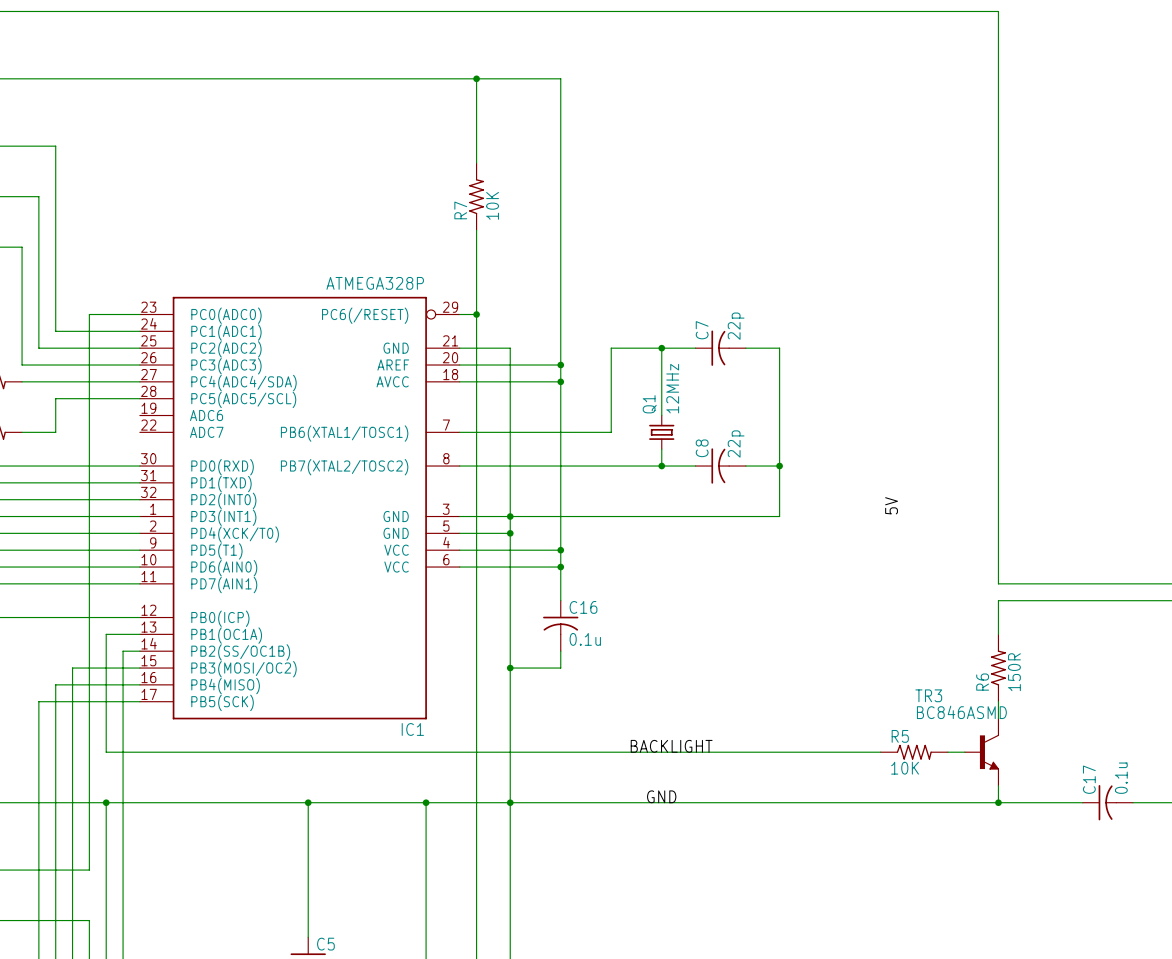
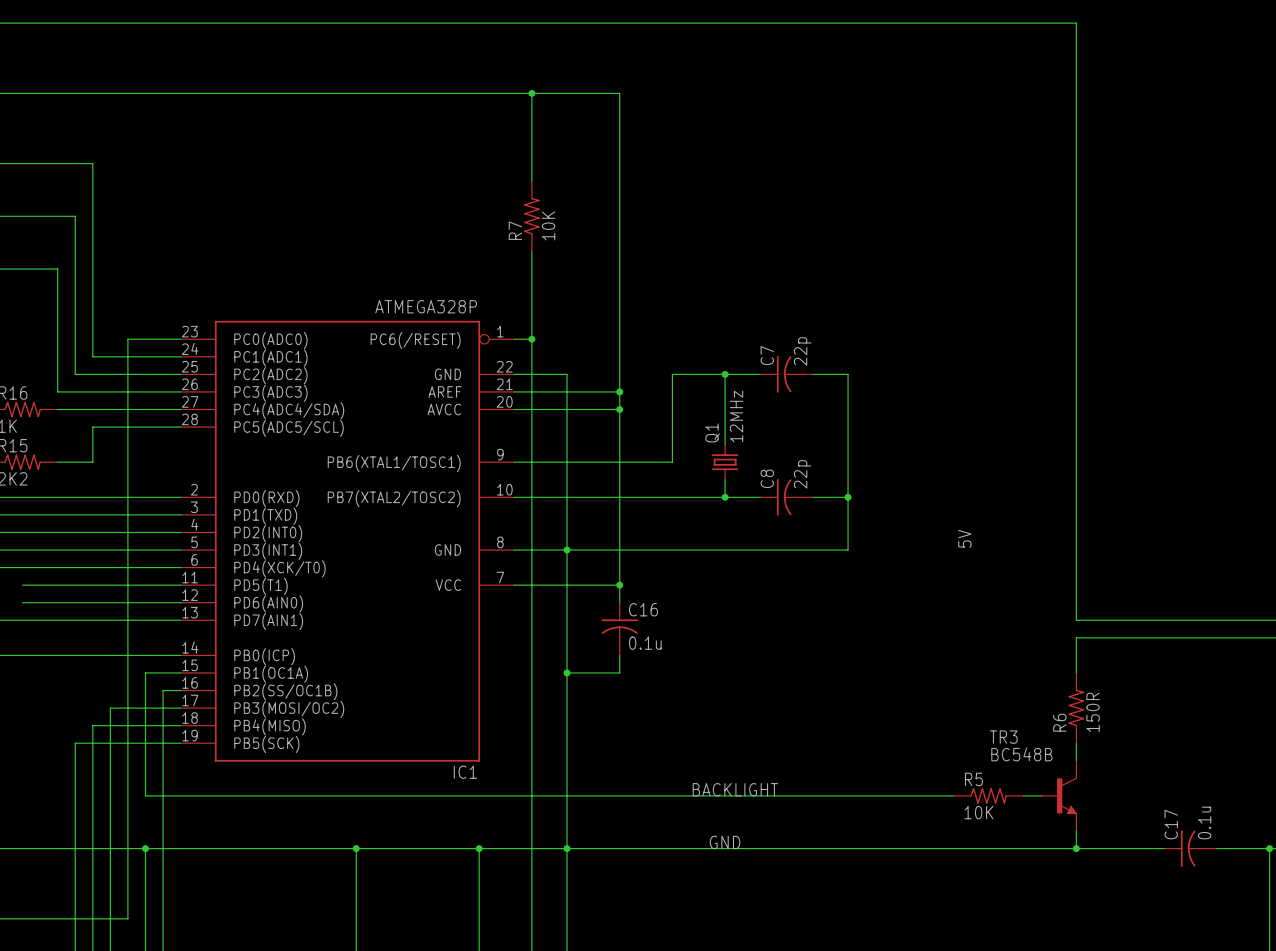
IC1 symbol: [139, 296, 460, 720] -> [180, 320, 515, 762]
wire: (459, 533) (510, 533) -> none
junction: (510, 533) -> none
wire: (459, 567) (560, 567) (560, 600) -> none
junction: (560, 567) -> none
C16 position: (560, 625) -> (619, 629)
wire: (560, 651) (560, 668) (510, 668) -> (619, 655) (619, 672) (567, 672)
junction position: (510, 668) -> (567, 672)
TR3 value: BC846ASMD (961, 712) -> BC548B (1021, 754)

